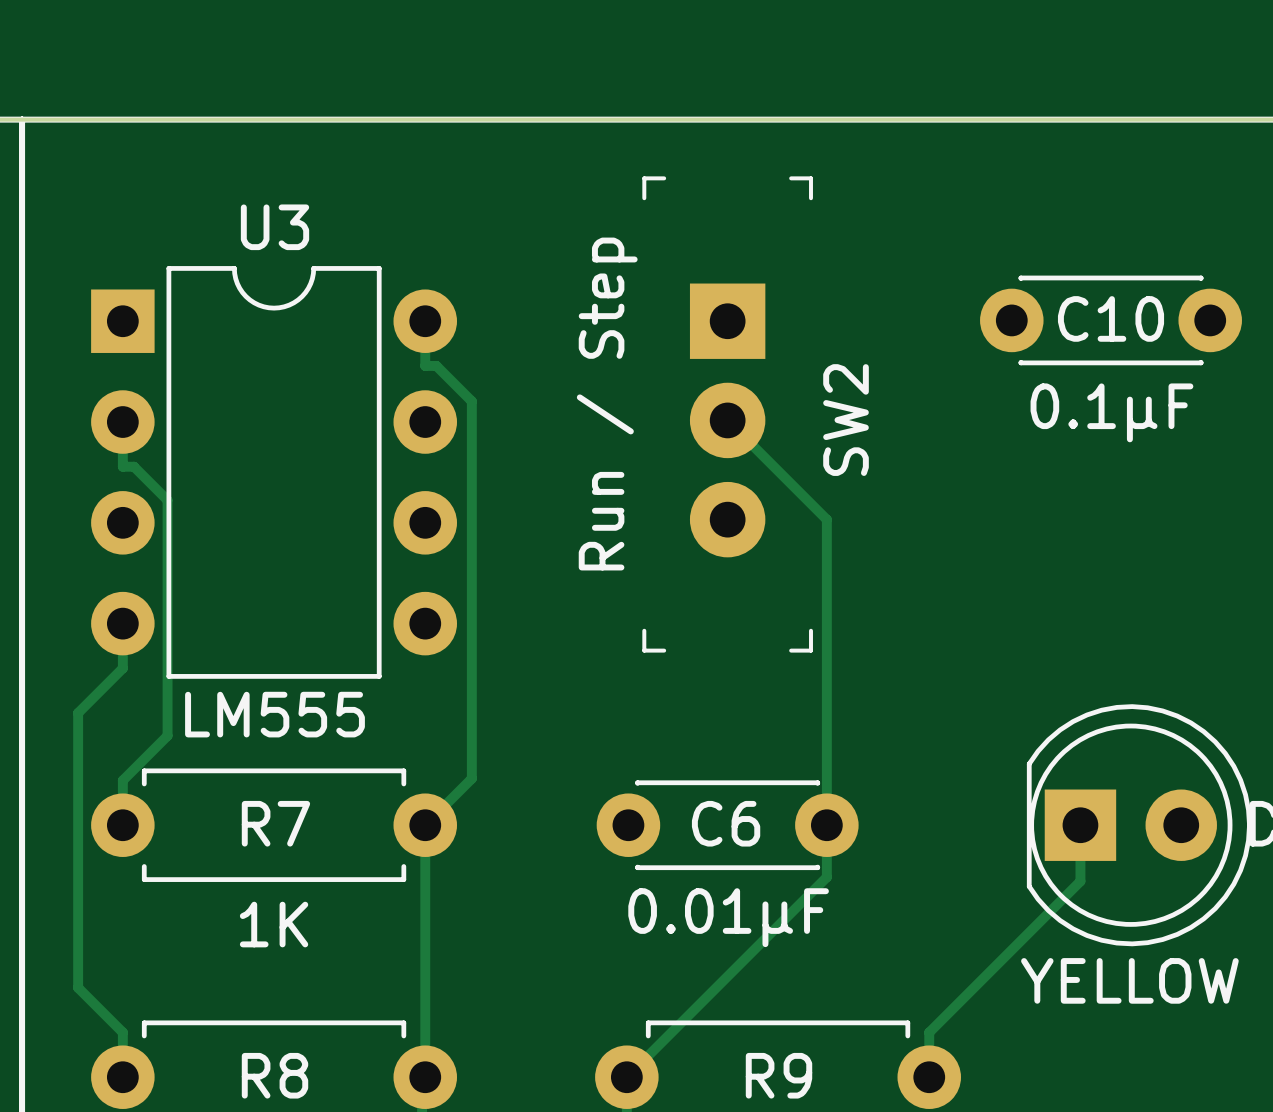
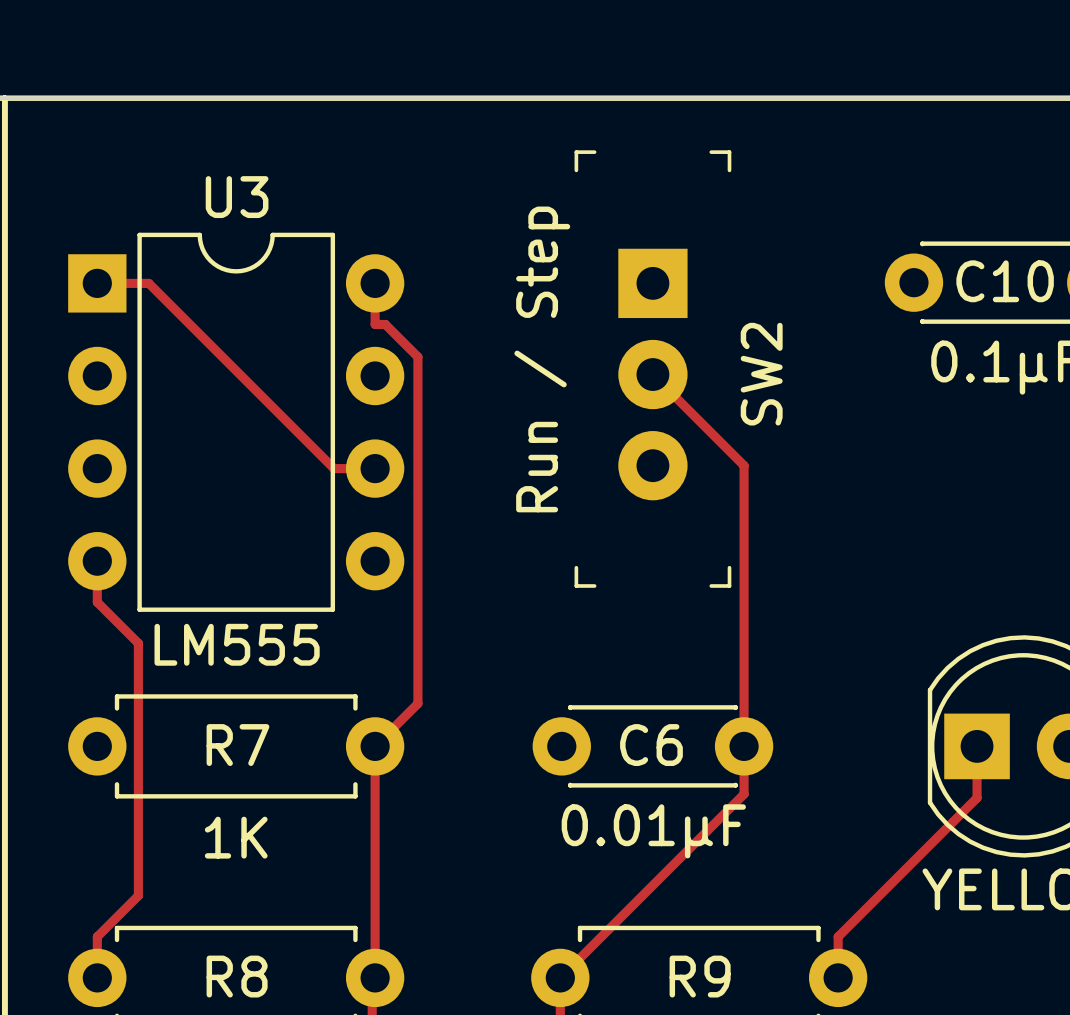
track: none -> (97, 283) (148, 283) (334, 468) (375, 468)
track: (122, 422) (122, 466) (134, 466) (167, 500) (167, 713) -> (97, 602) (138, 643)
track: (122, 668) (78, 713) (78, 987) (122, 1032) -> (138, 664) (138, 895) (97, 936)
track: (167, 735) (122, 780) (122, 825) -> none

